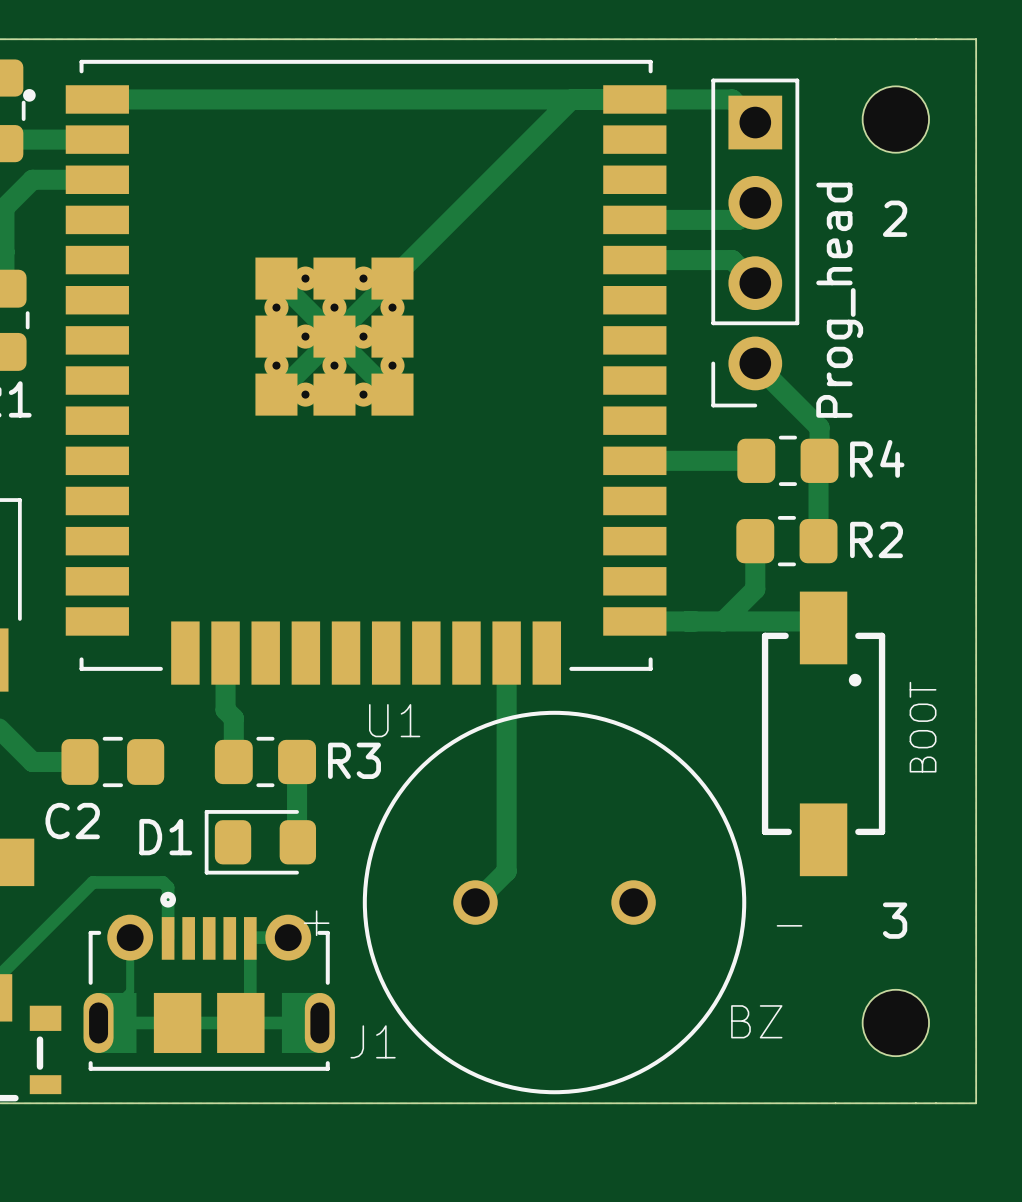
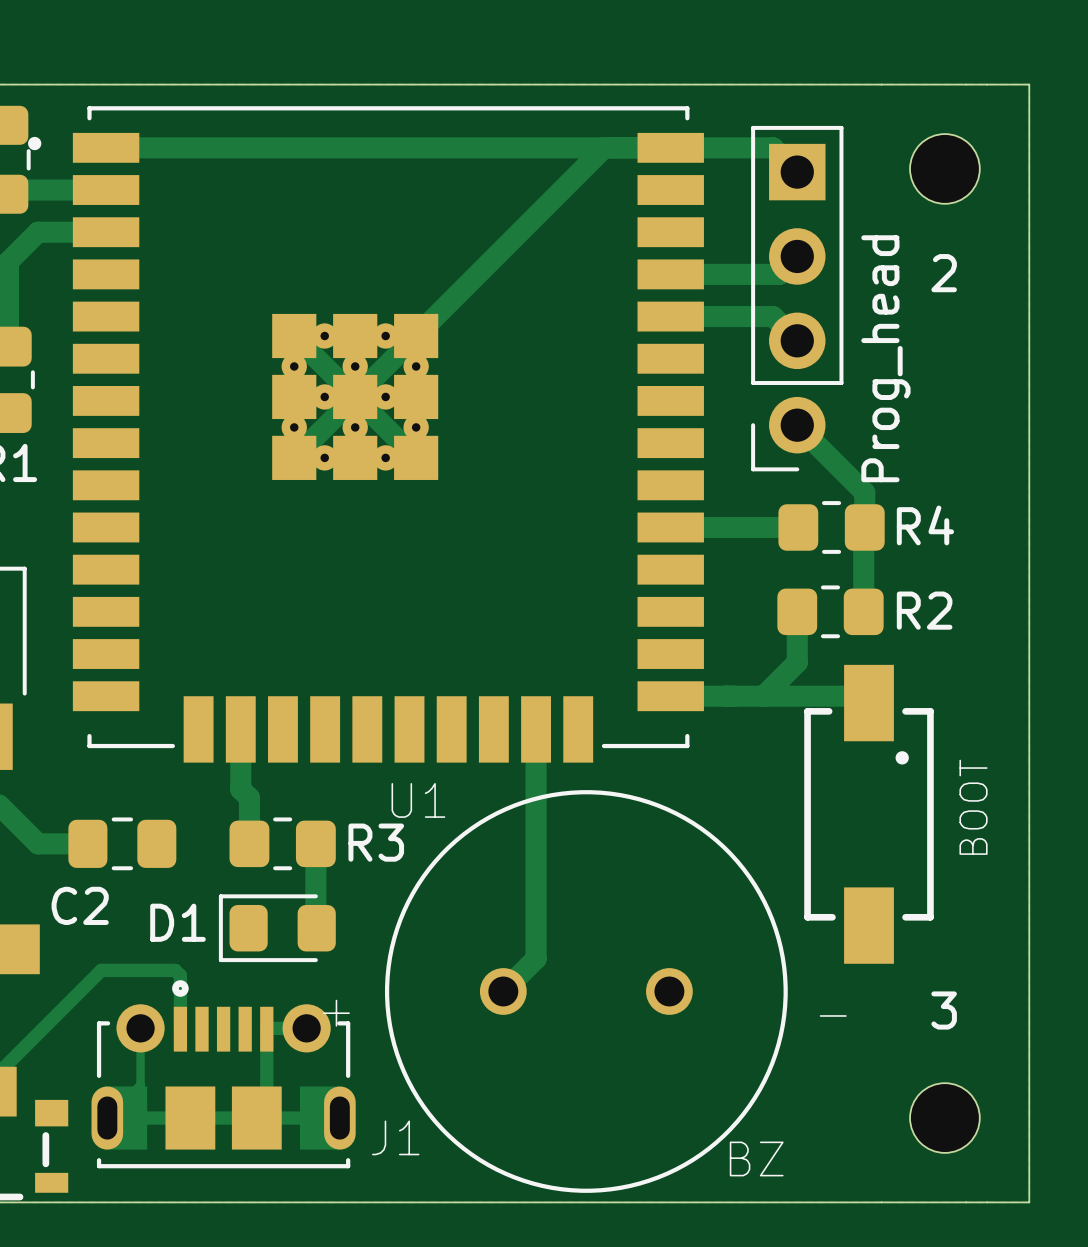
BZ name position: BZ (756, 1021) -> BZ (756, 1158)

